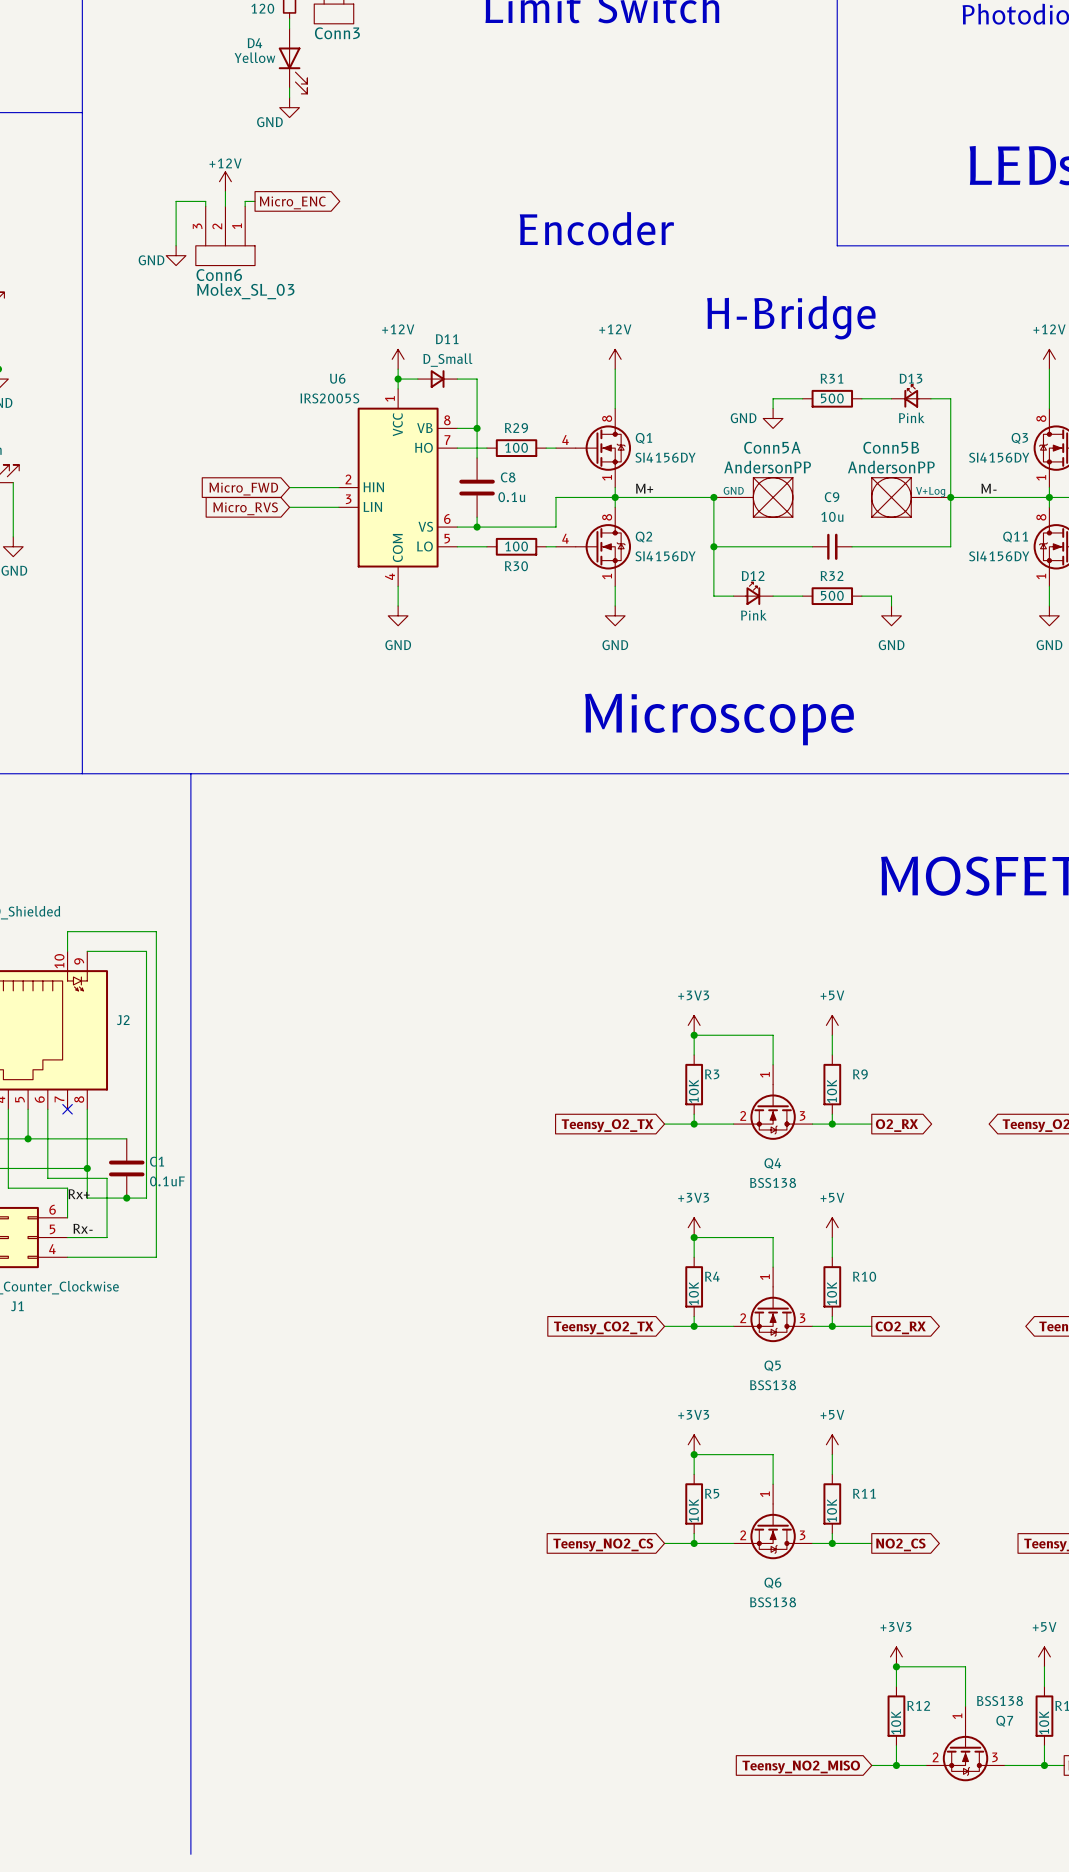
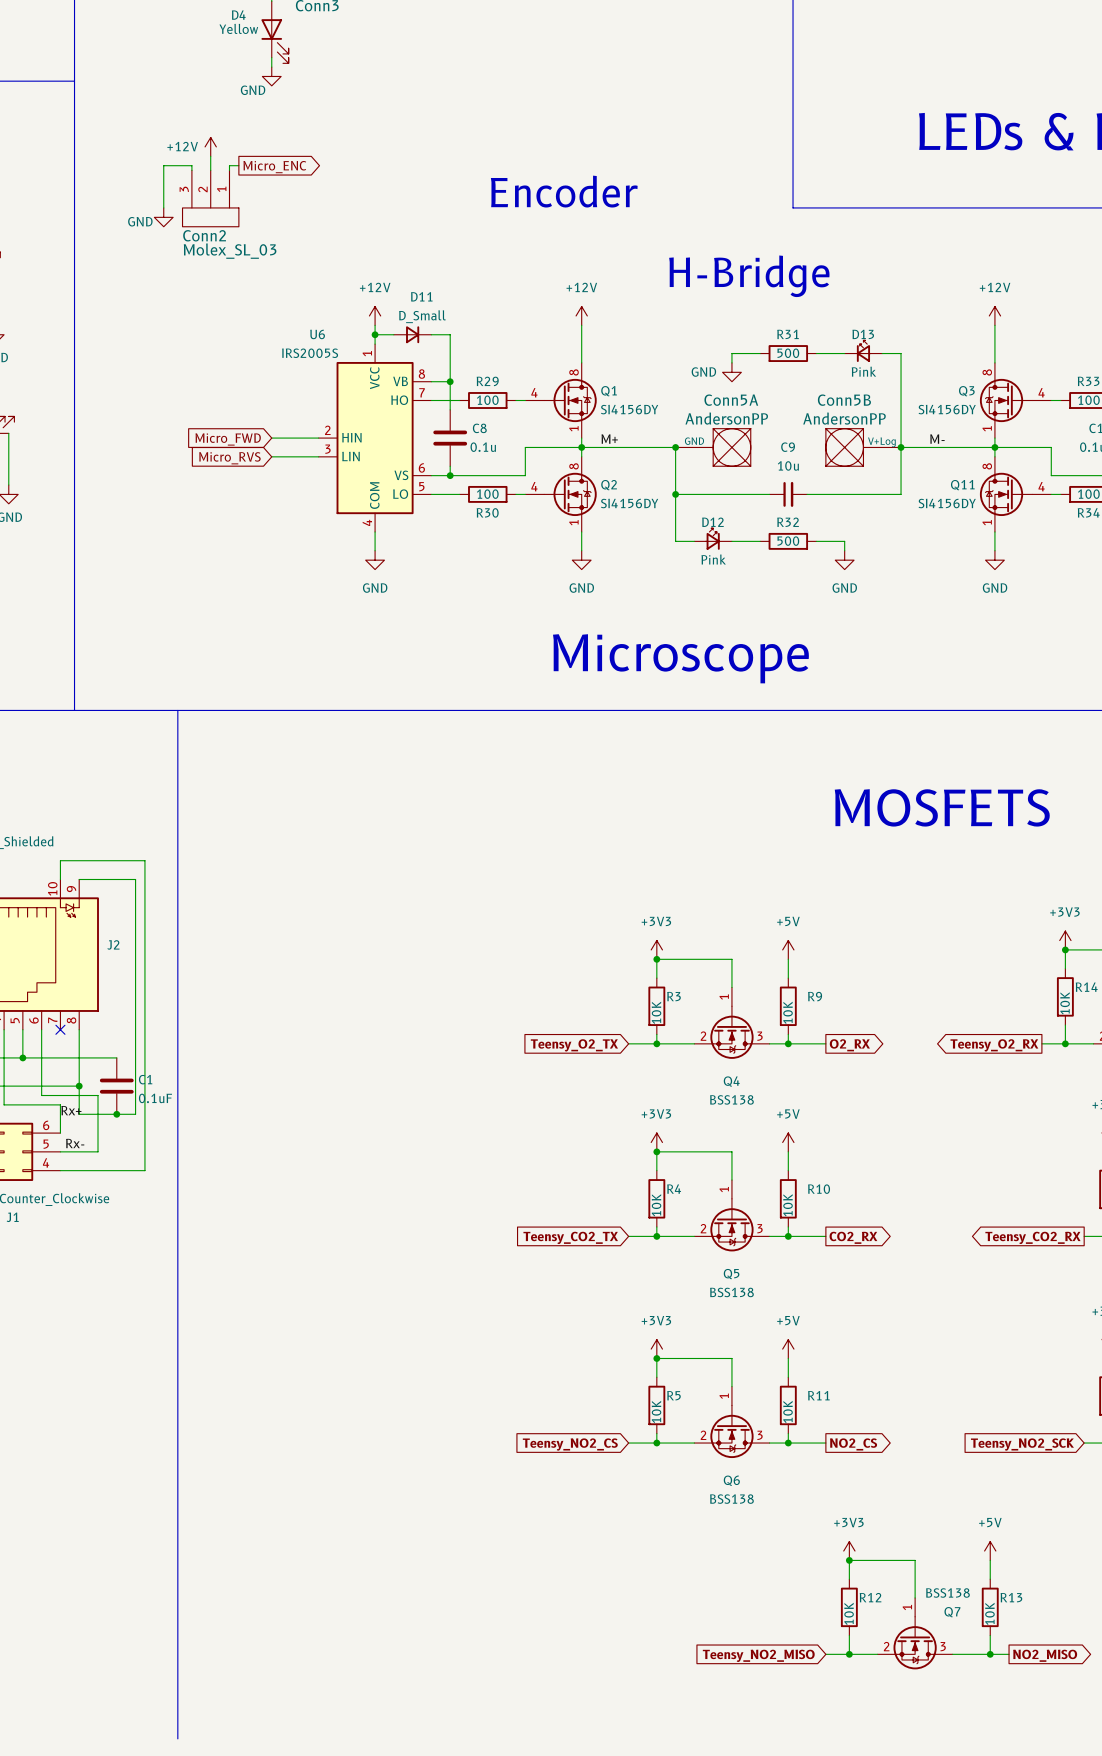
power symbol text position: +12V (225, 163) -> +12V (182, 146)
Conn6 name: Conn6 (219, 275) -> Conn2 (204, 235)

